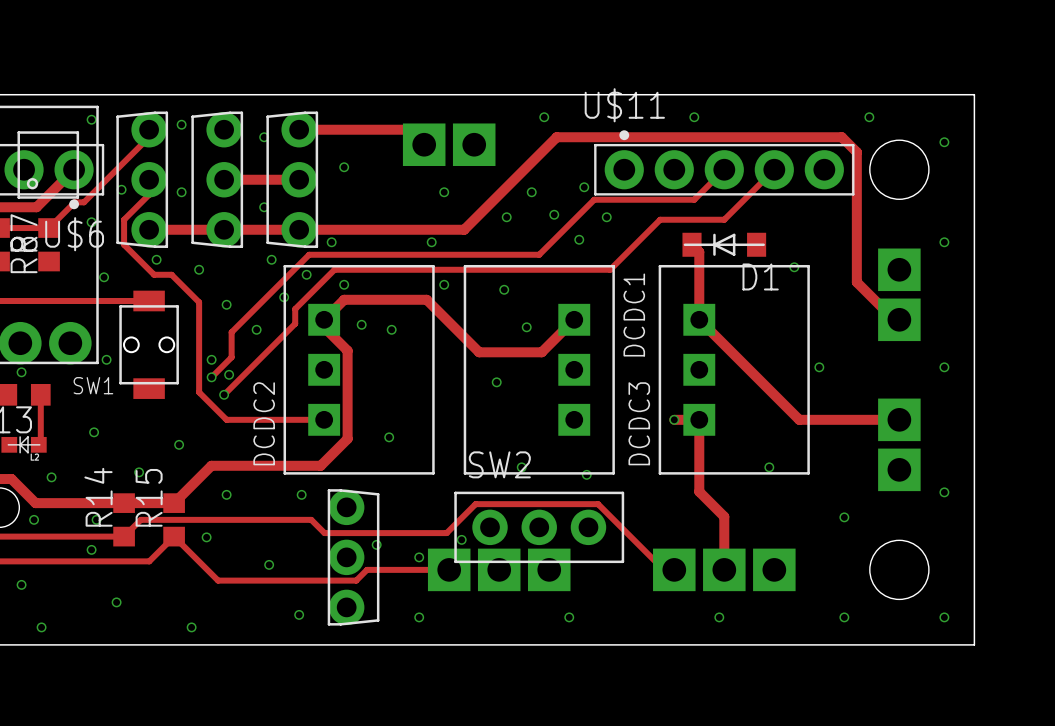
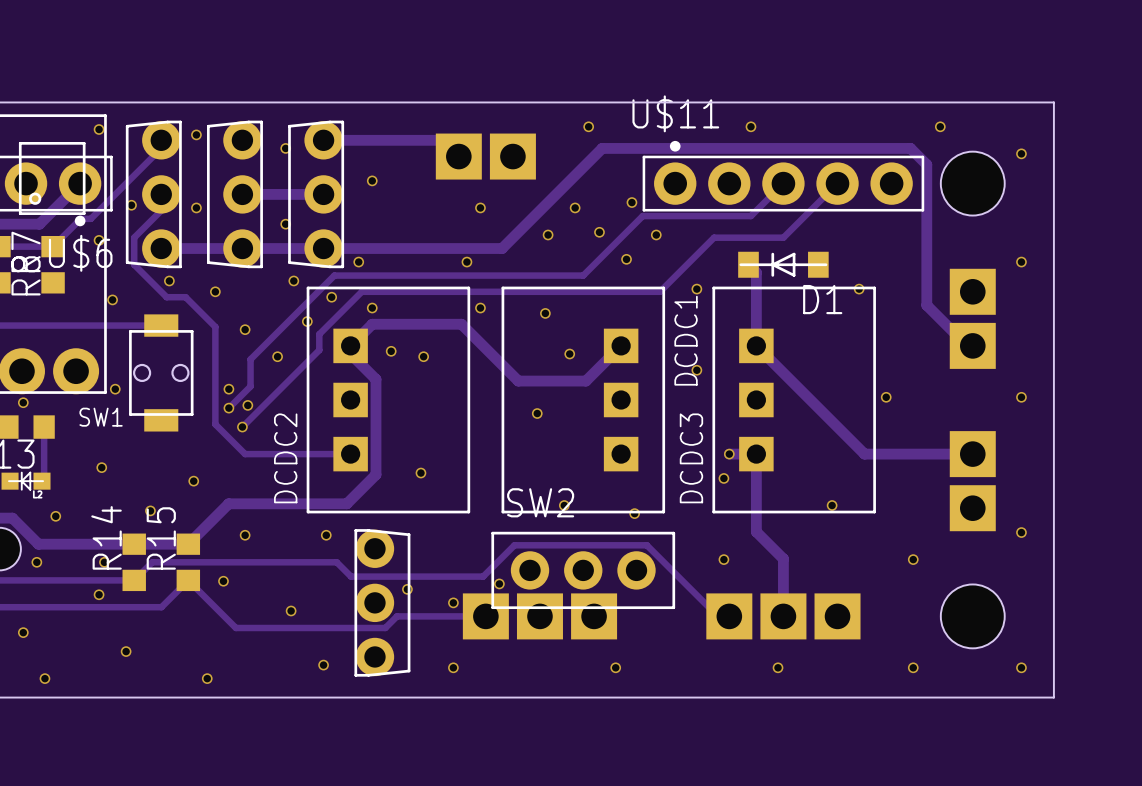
via: none -> (696, 289)
via: none -> (696, 370)
via: none -> (723, 478)
via: none -> (723, 559)

